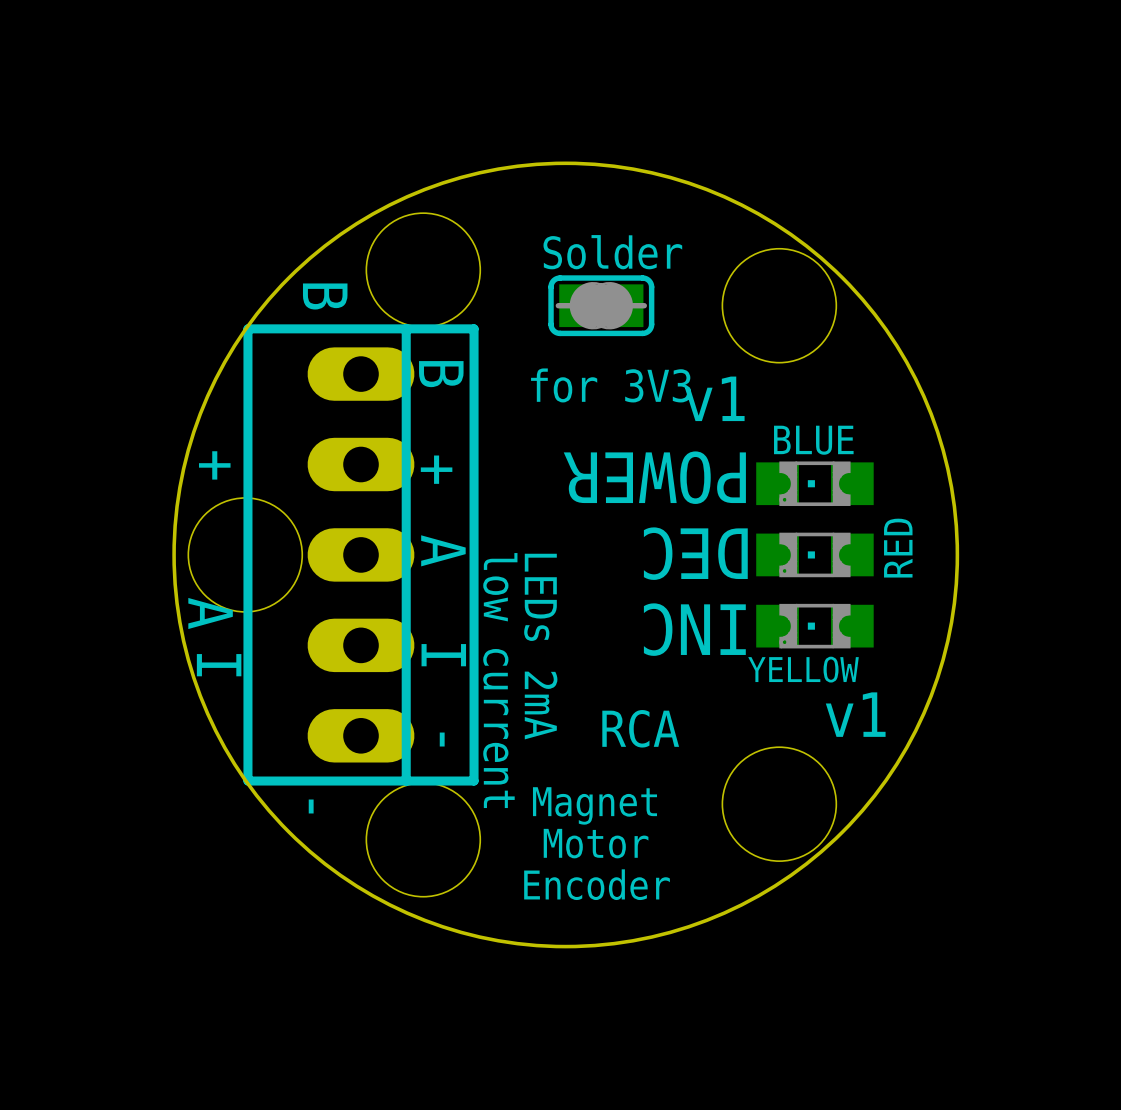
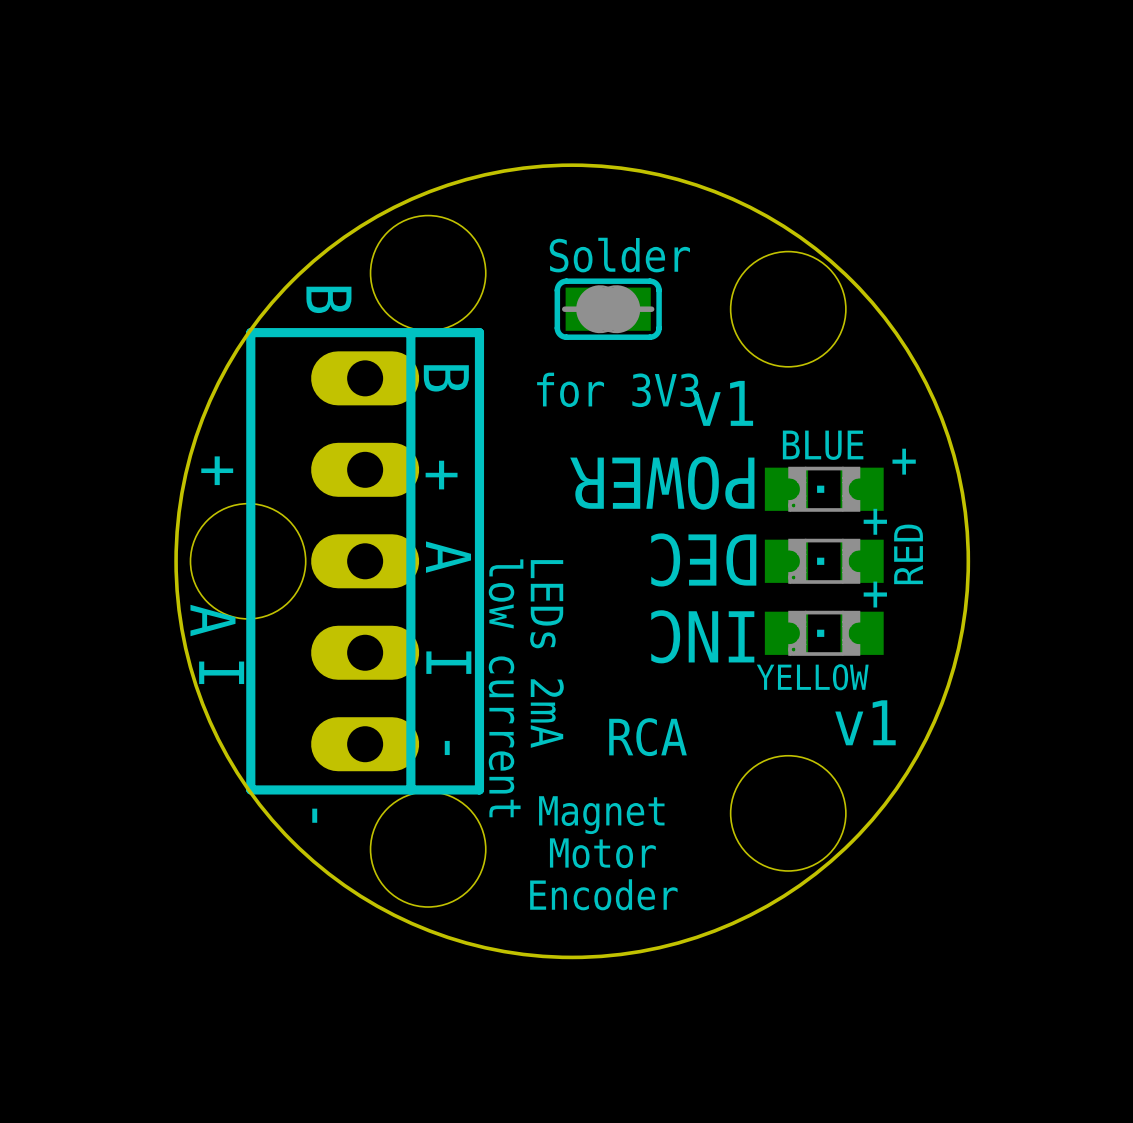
text: none -> + (904, 461)
text: none -> + (875, 521)
text: none -> + (875, 594)

